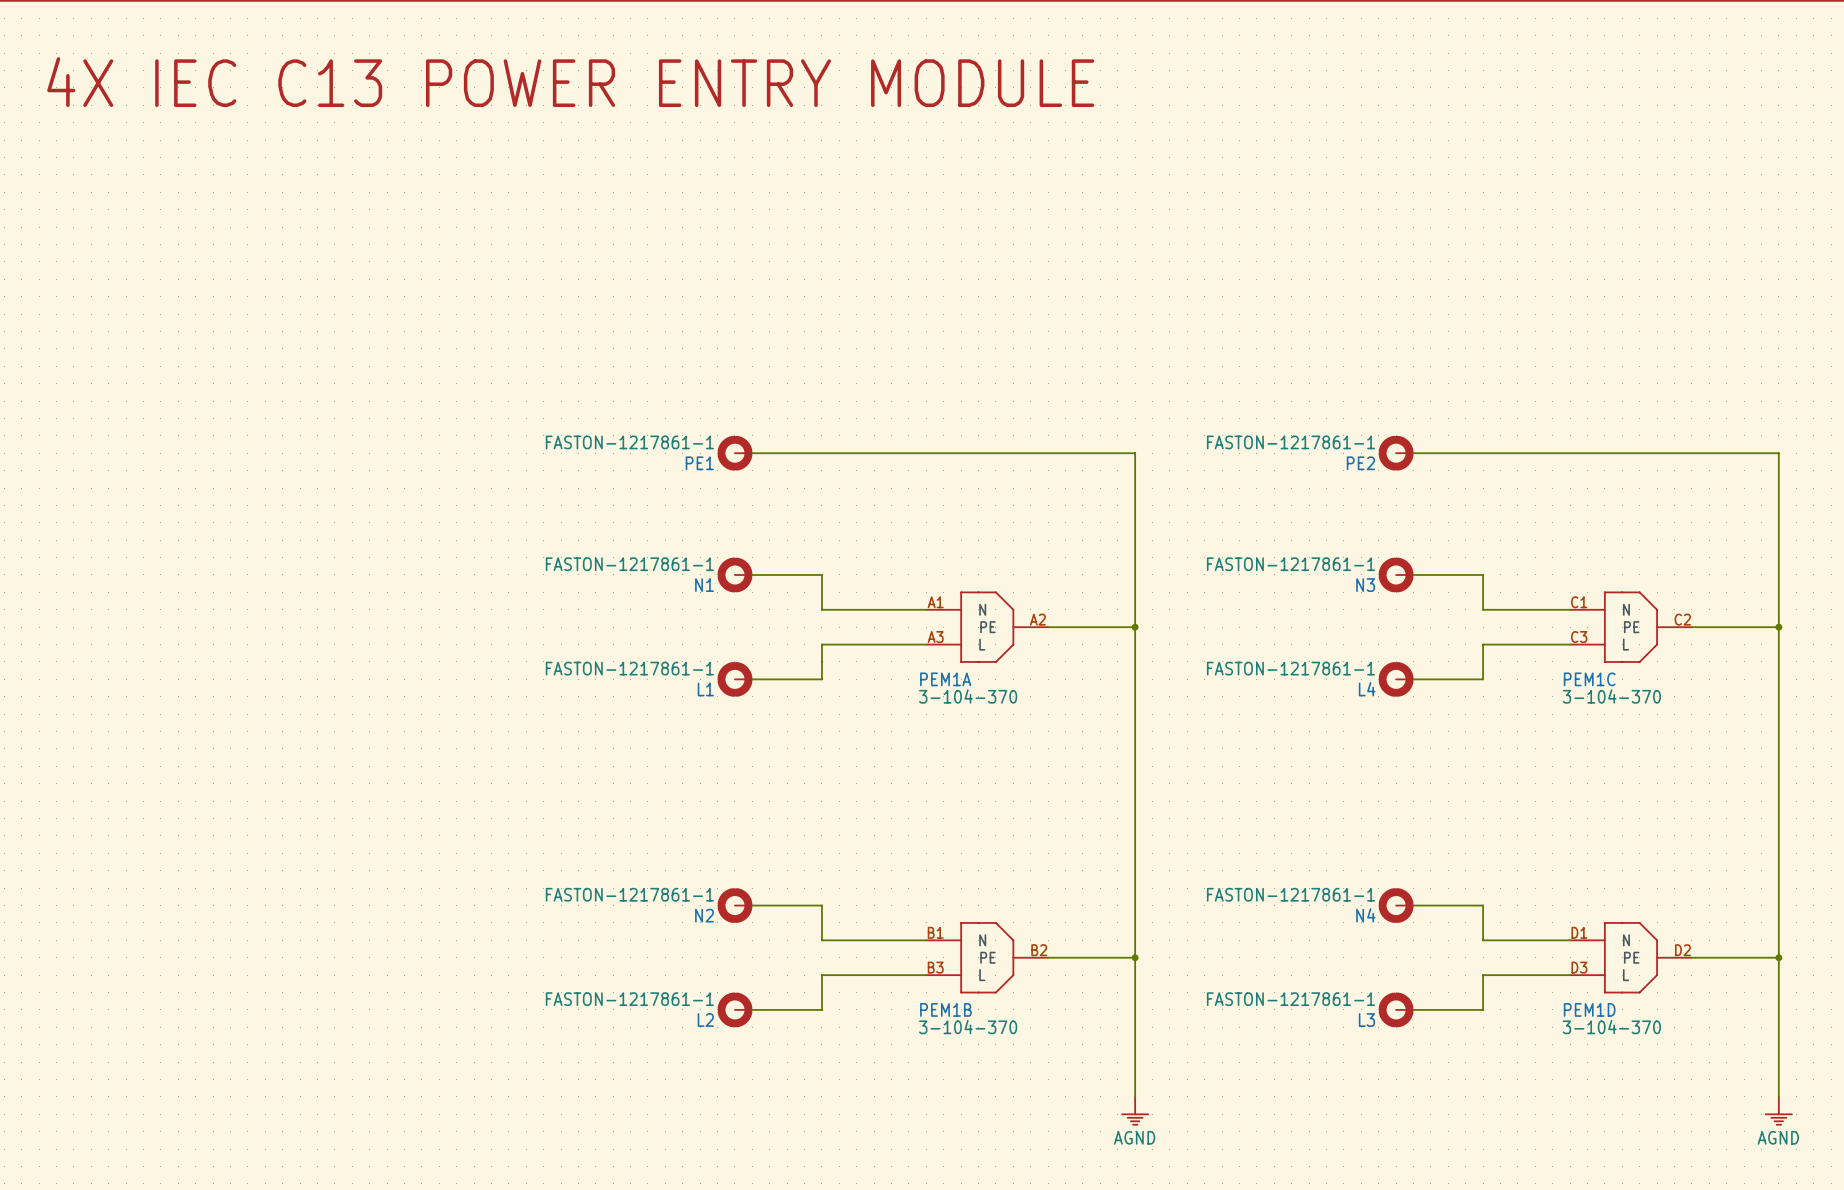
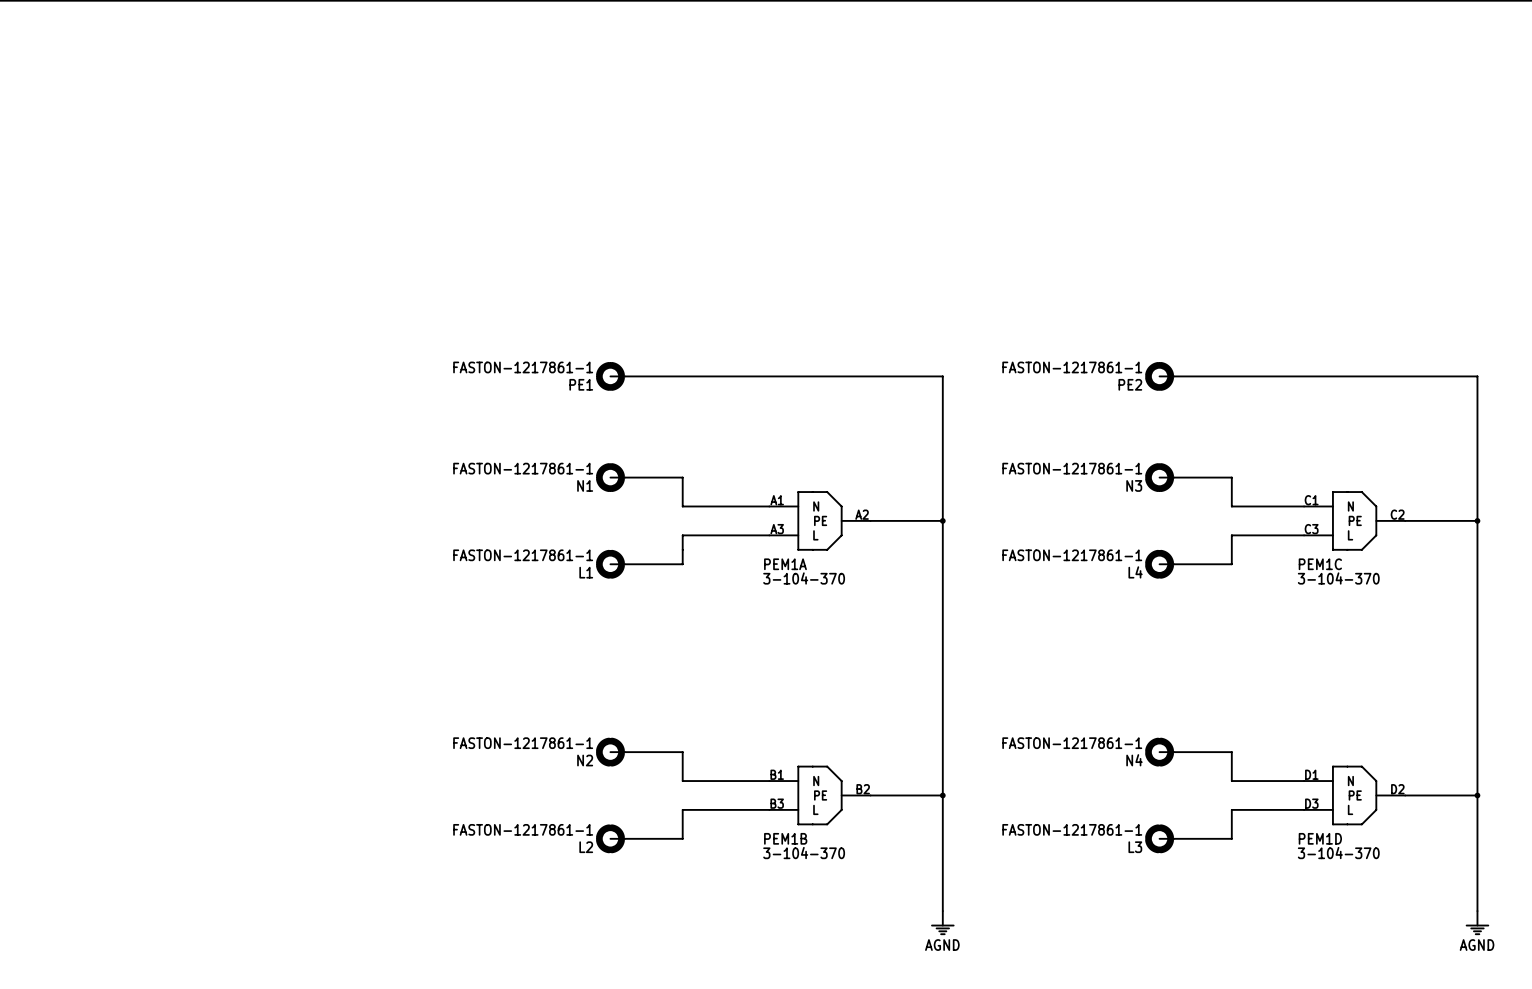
text: 4X IEC C13 POWER ENTRY MODULE (570, 82) -> none

